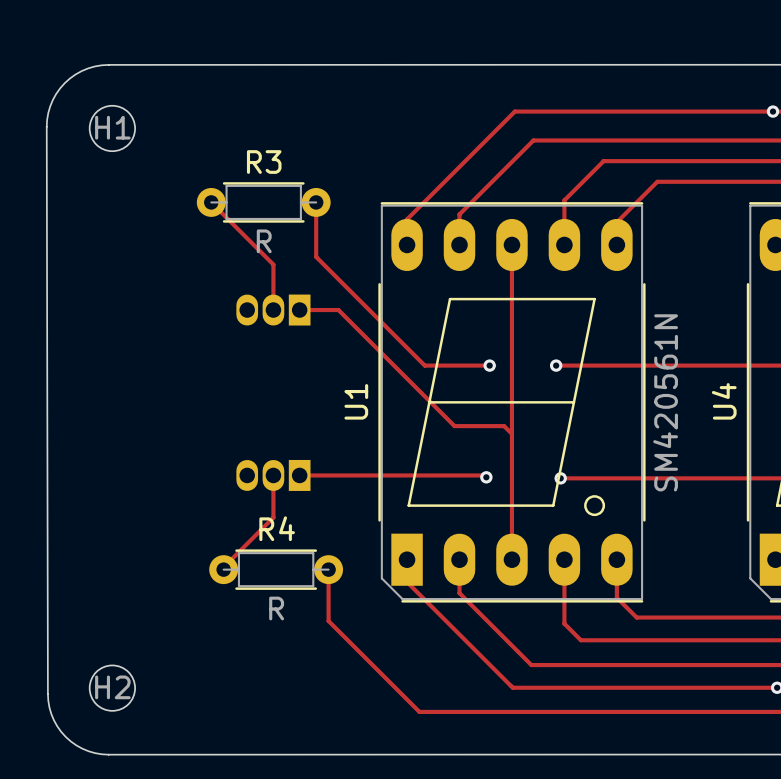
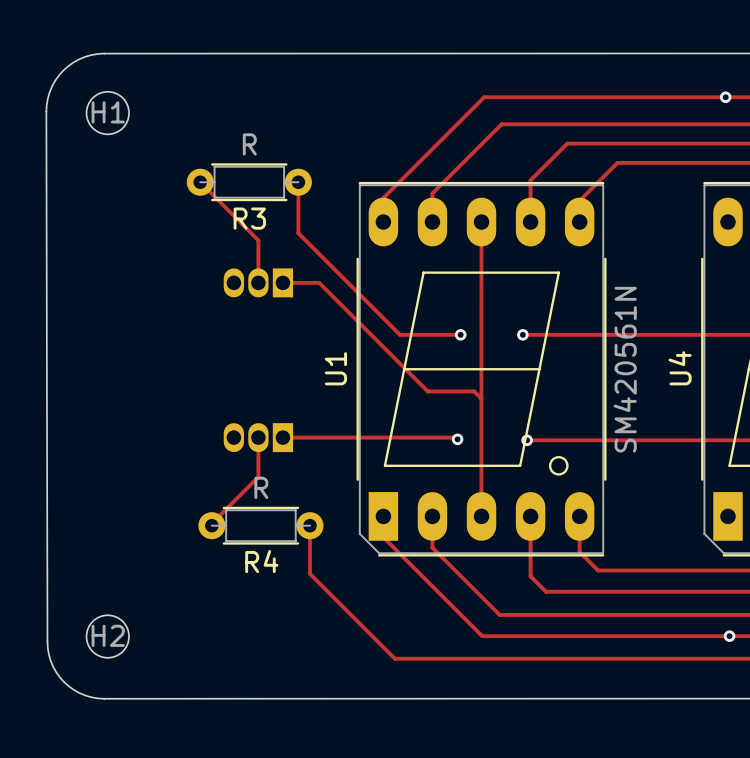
R3 name position: R3 (264, 162) -> R3 (249, 218)
R3 value position: R (264, 241) -> R (249, 144)
R4 name position: R4 (277, 528) -> R4 (261, 561)
R4 value position: R (276, 608) -> R (261, 487)

